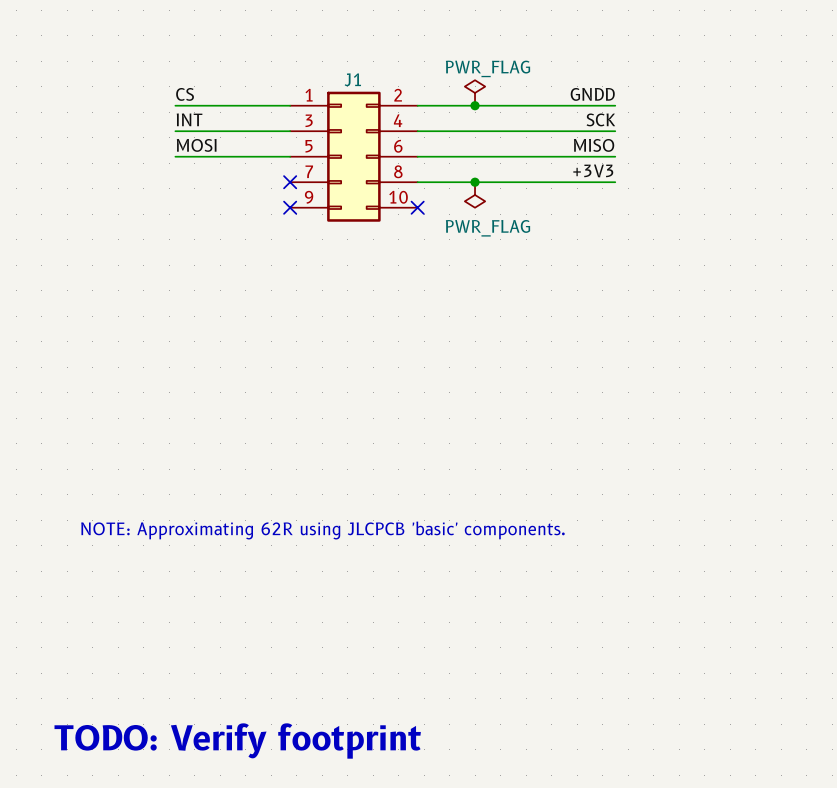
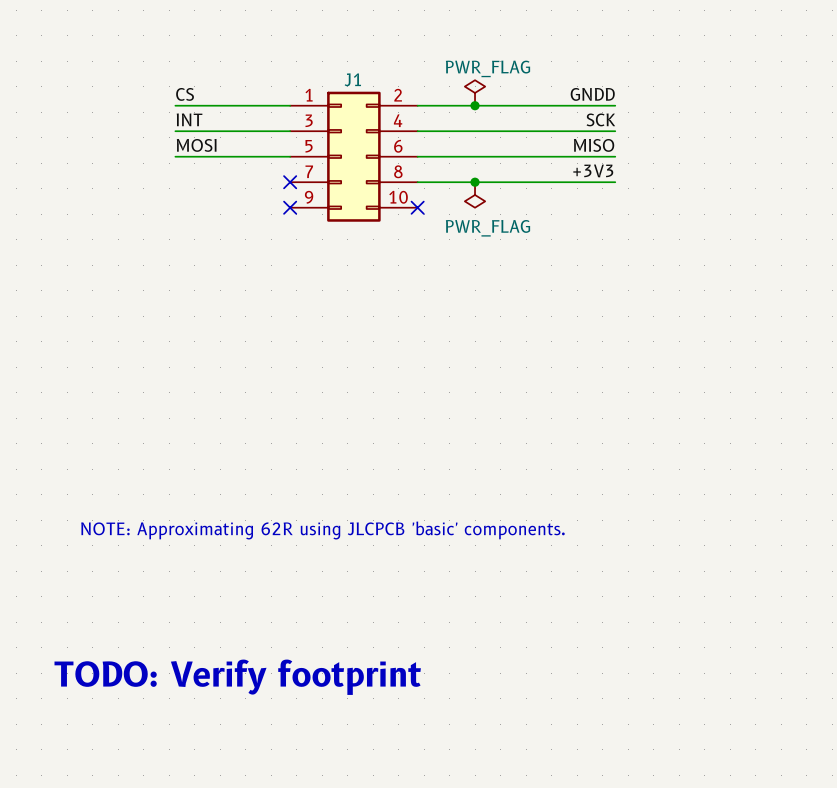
text position: TODO: Verify footprint (237, 741) -> TODO: Verify footprint (237, 677)

